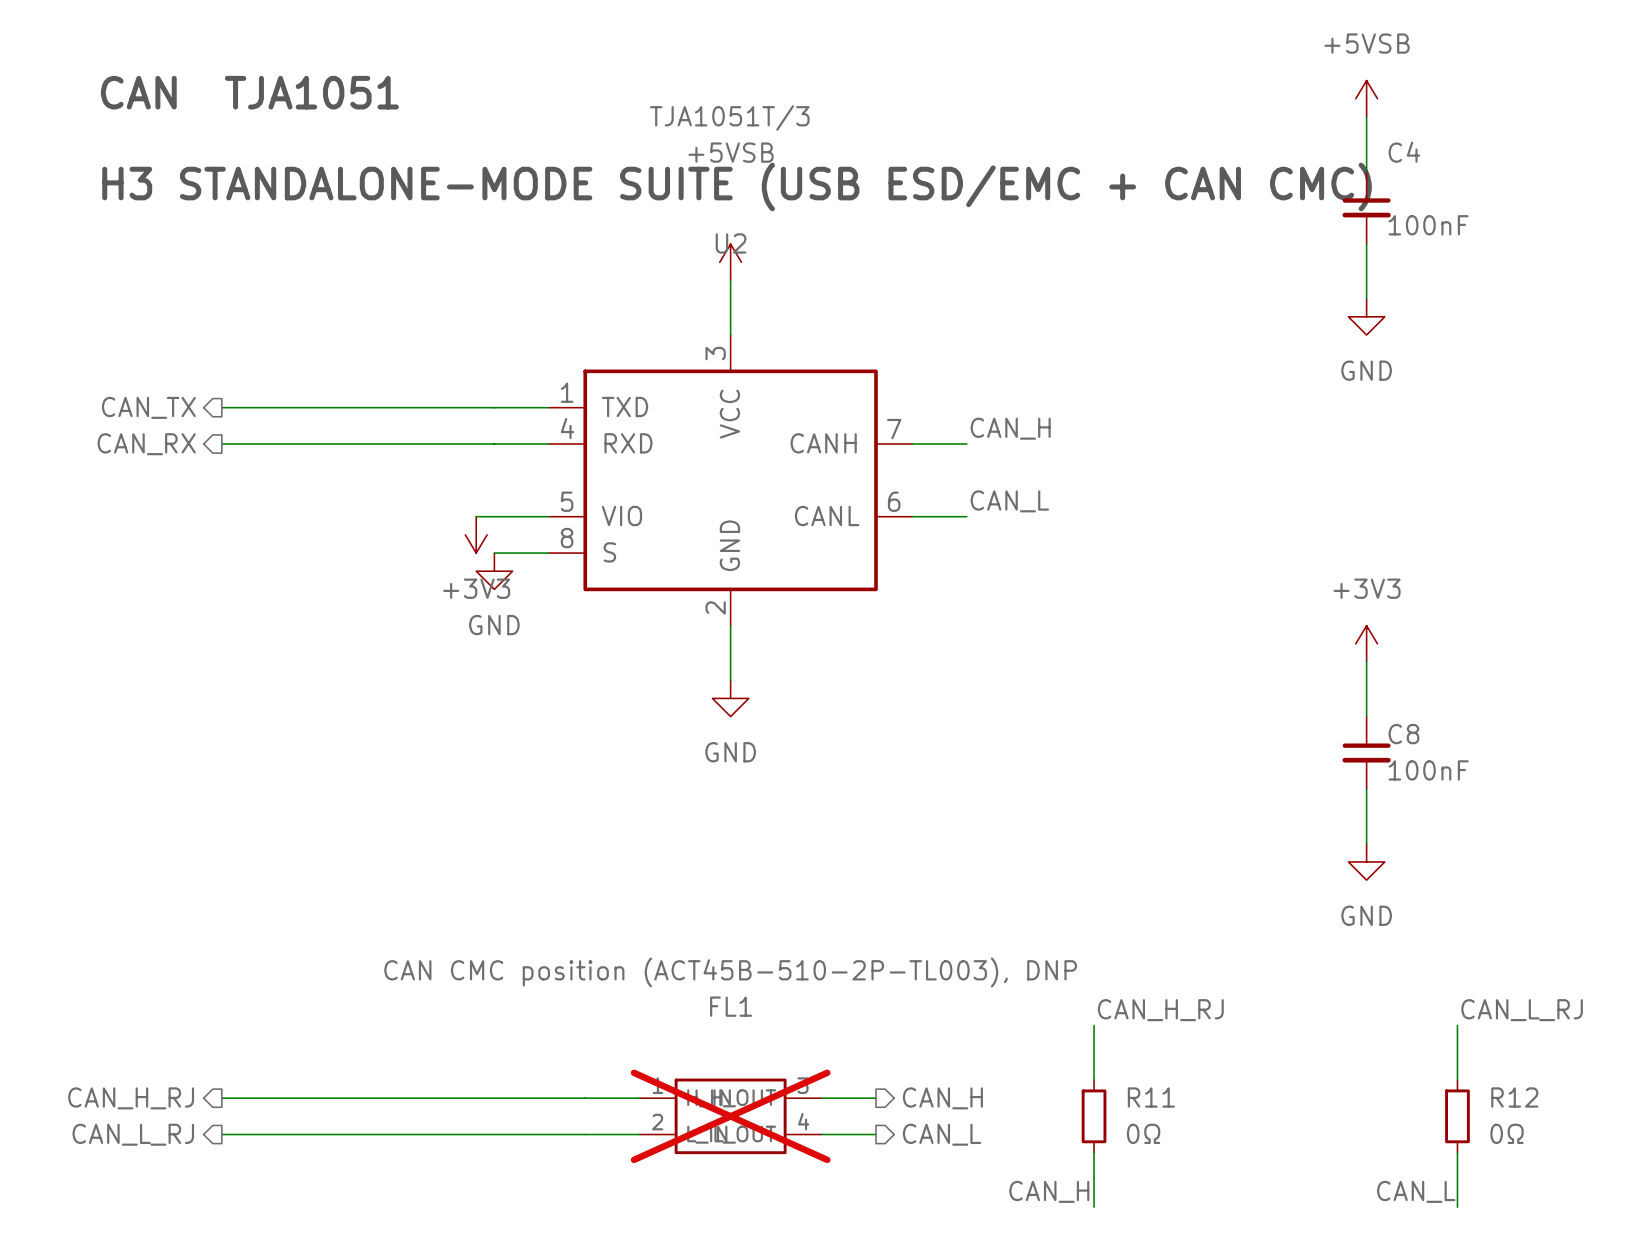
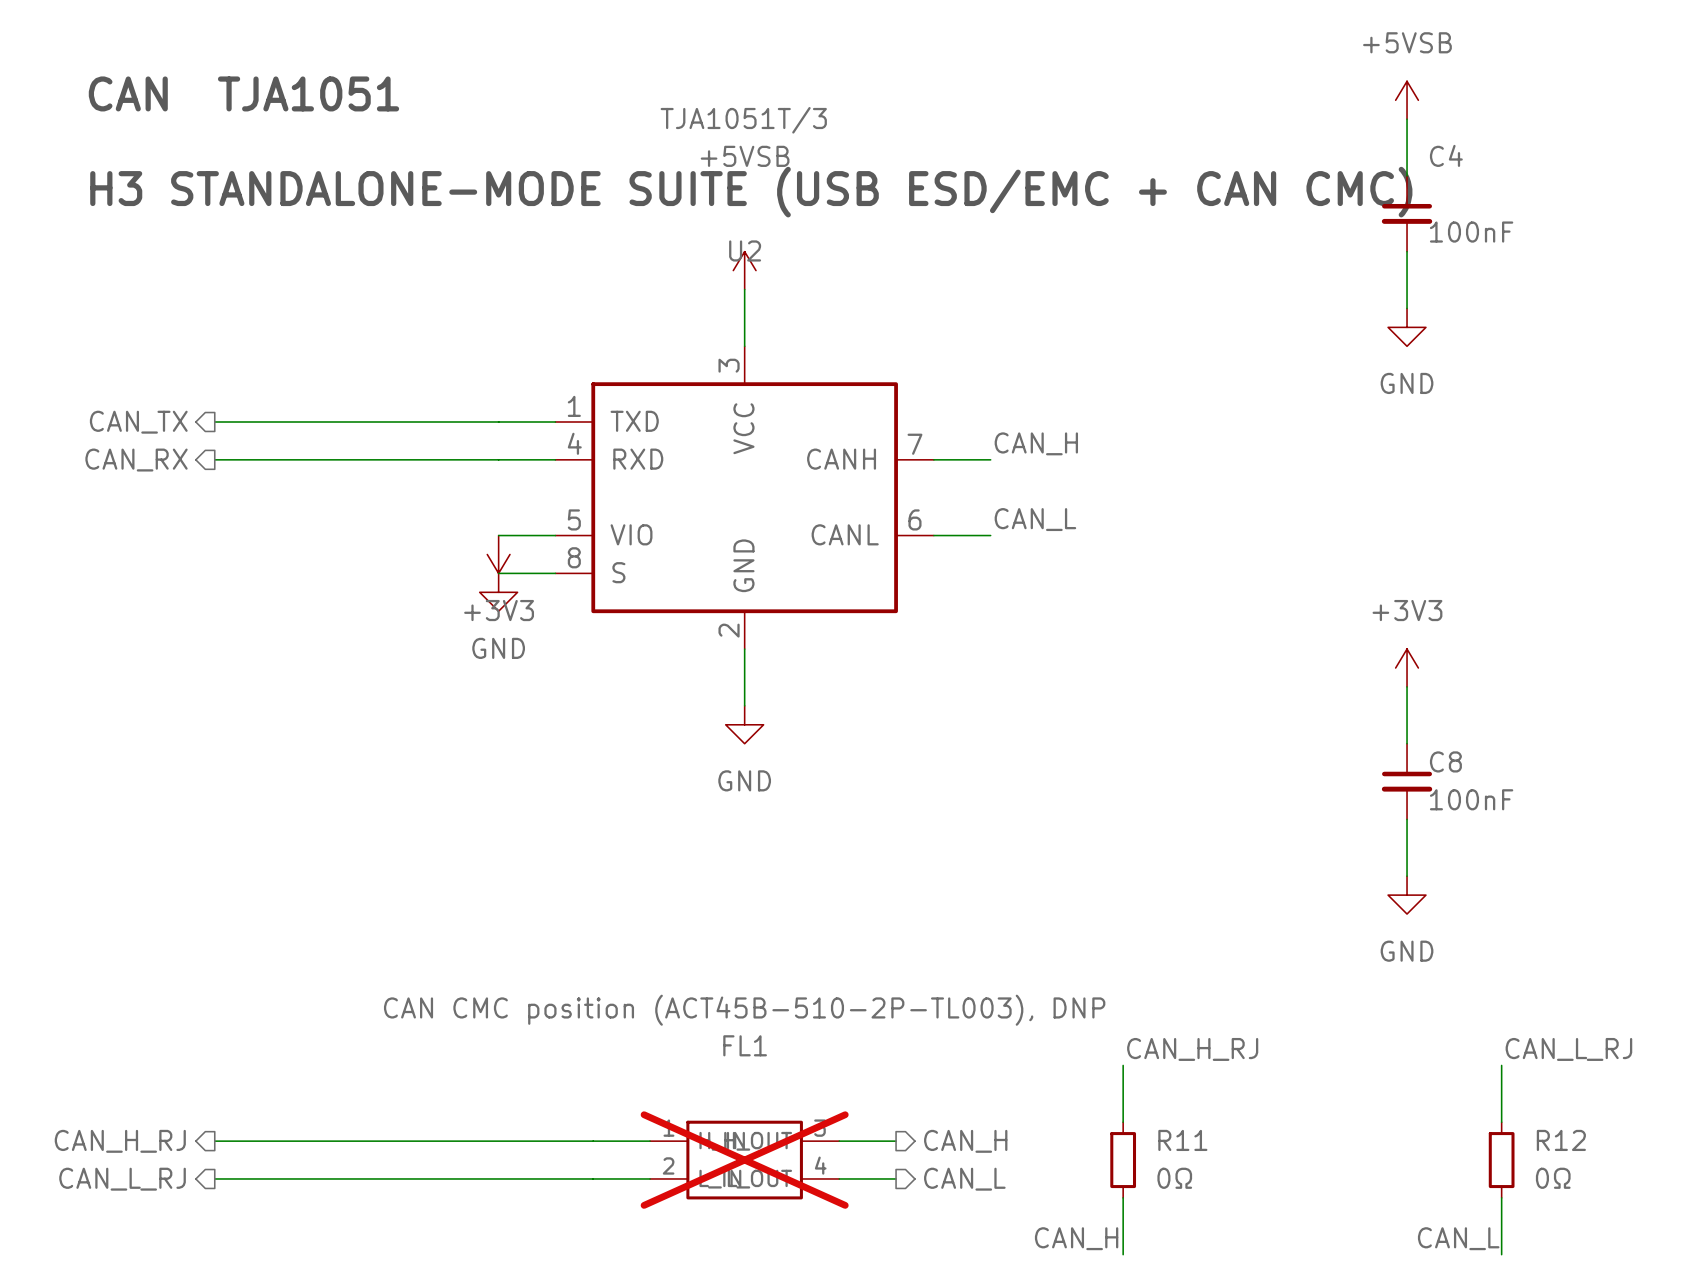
wire: (476, 516) (494, 516) -> none
power symbol position: +3V3 (476, 534) -> +3V3 (498, 554)

